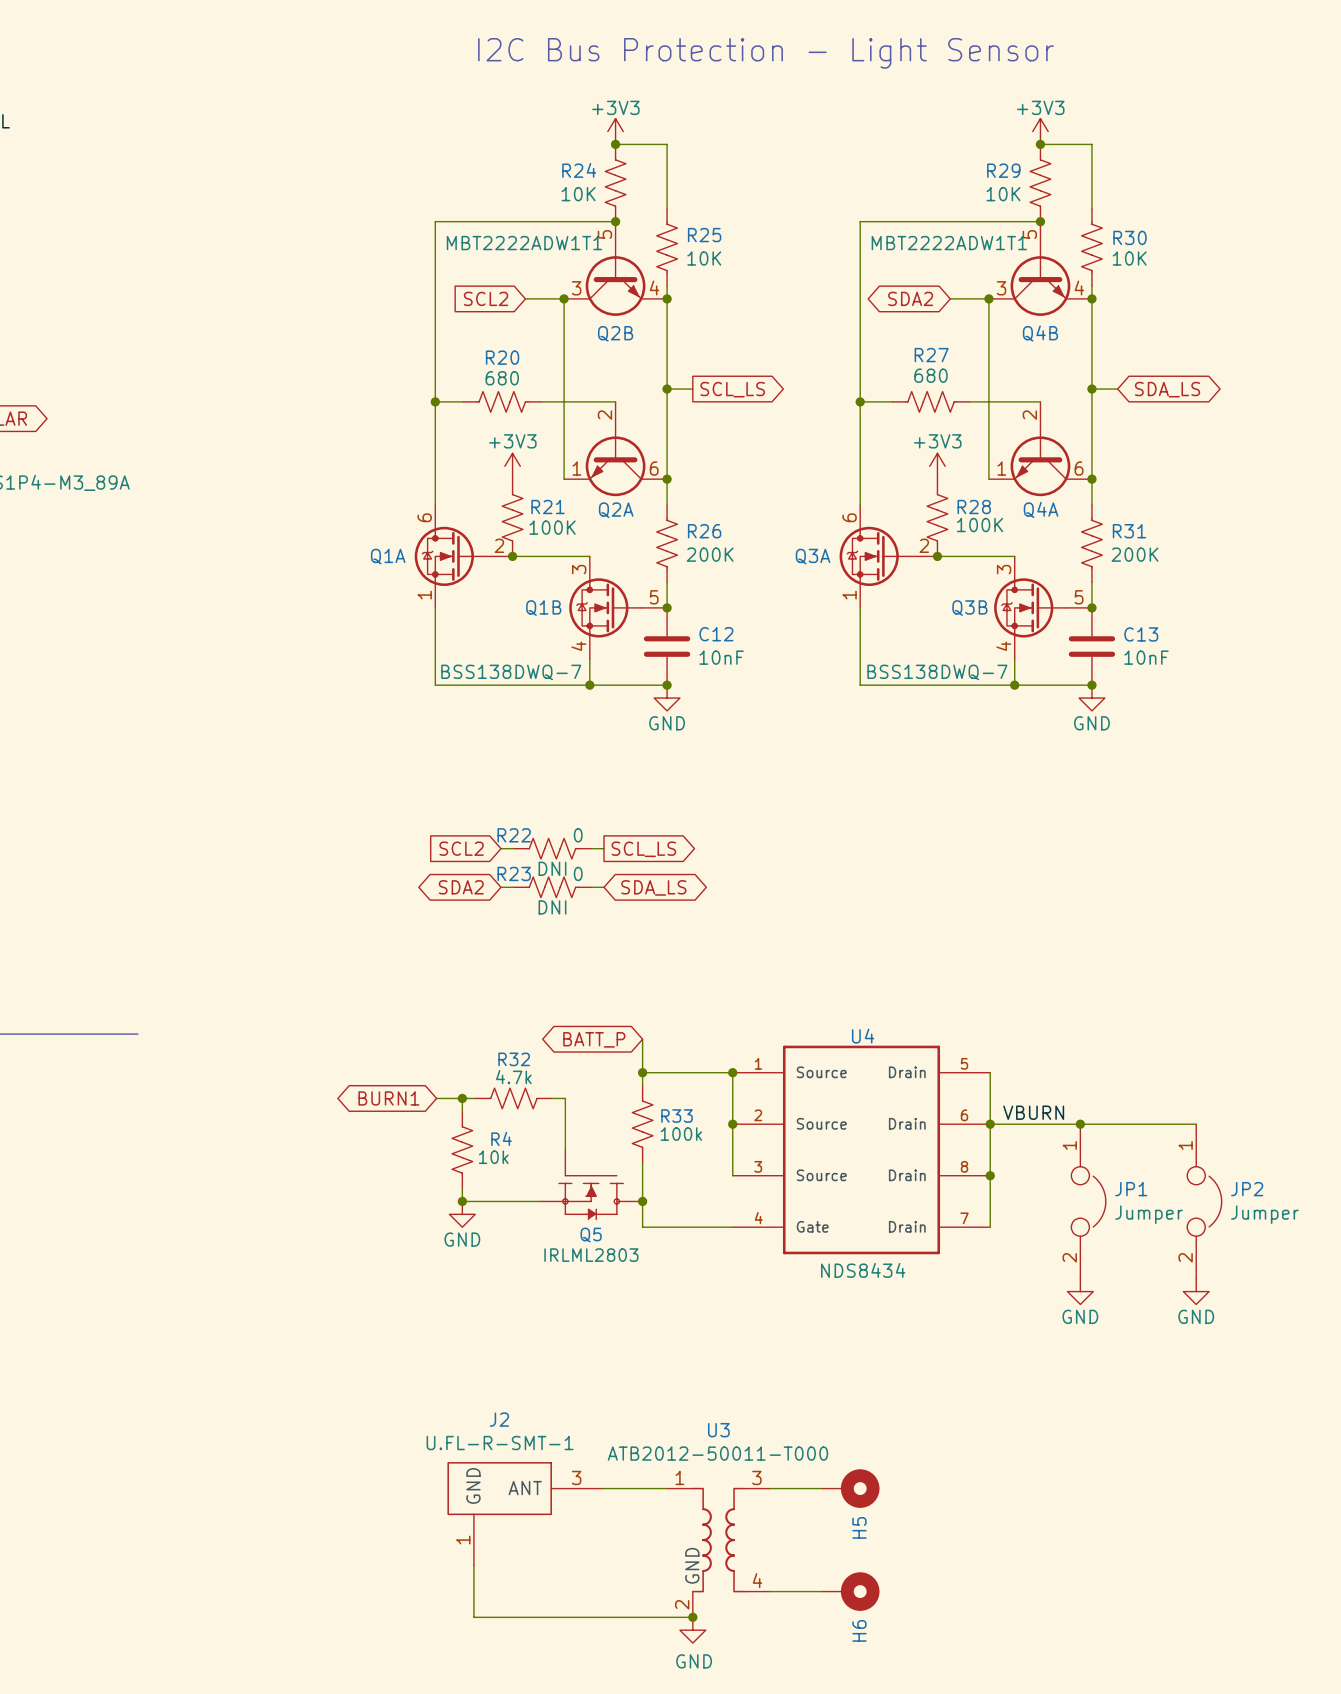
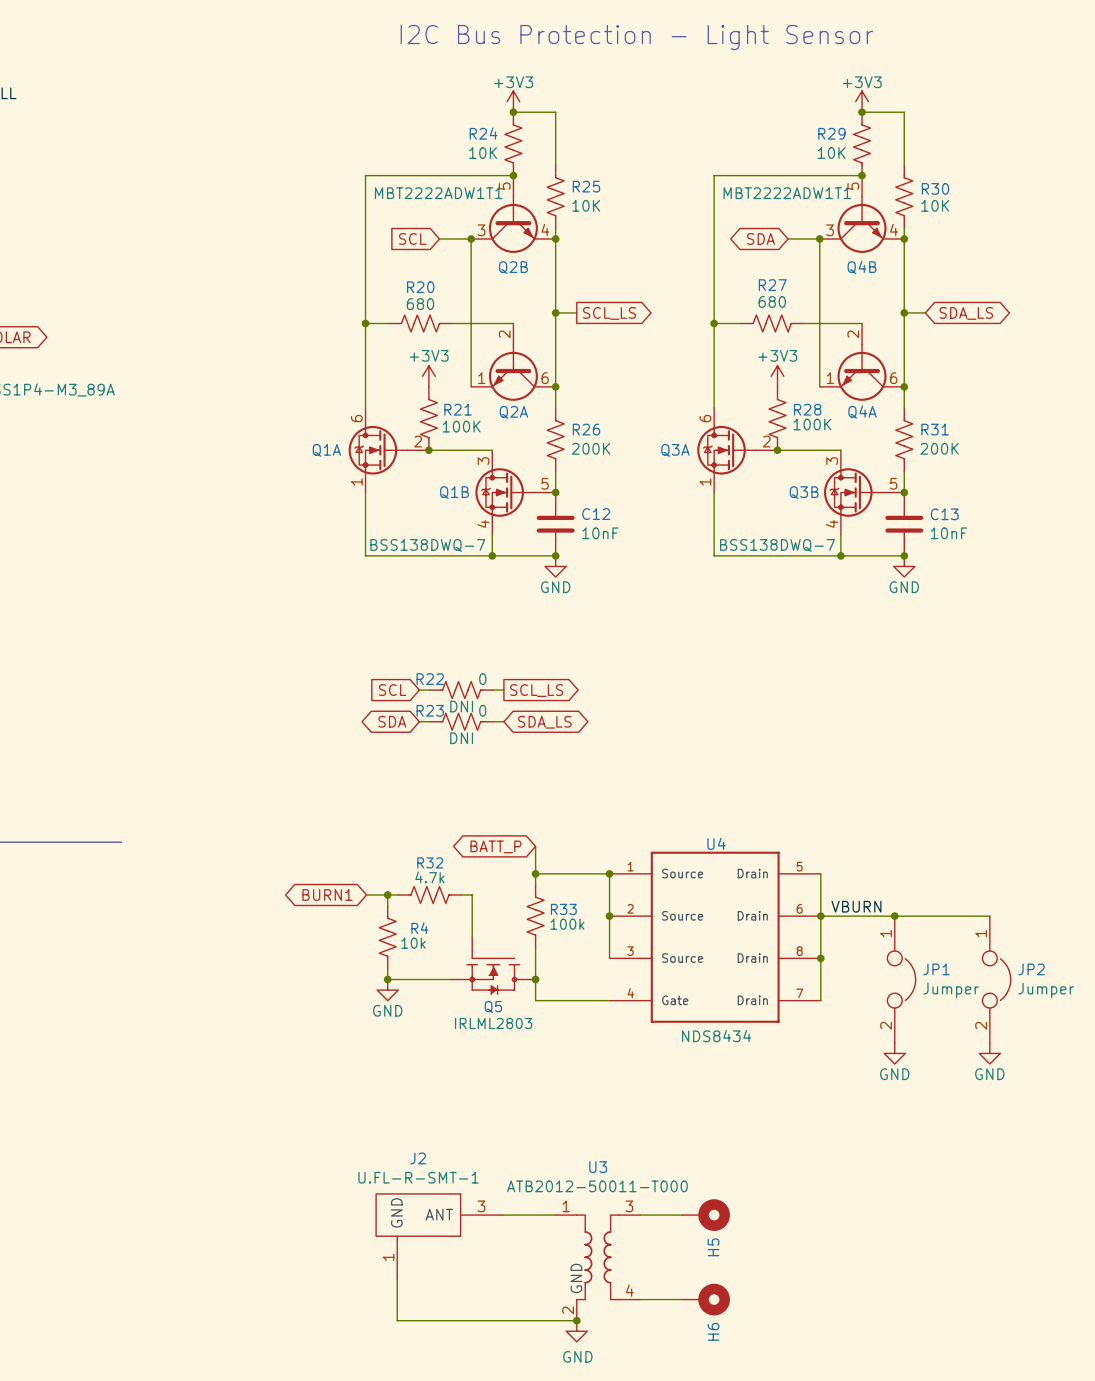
global label: SCL2 (486, 298) -> SCL (412, 238)
global label: SDA2 (910, 298) -> SDA (761, 238)
global label: SCL2 (461, 848) -> SCL (392, 690)
global label: SDA2 (461, 887) -> SDA (392, 721)

